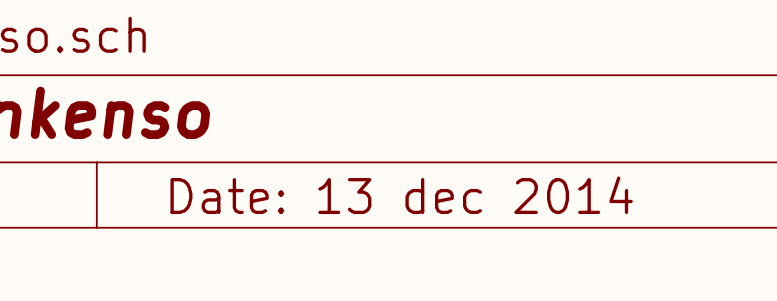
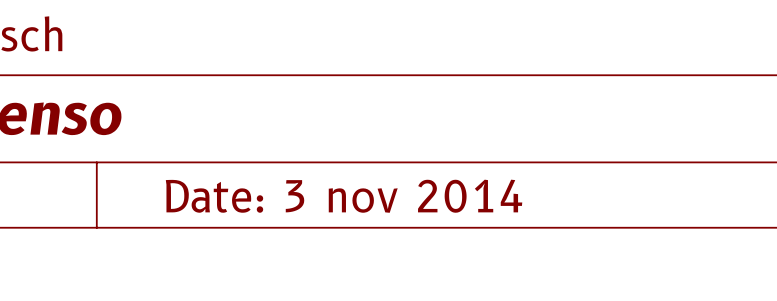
title block: Date: 13 dec 2014 (401, 195) -> Date: 3 nov 2014 (344, 196)

